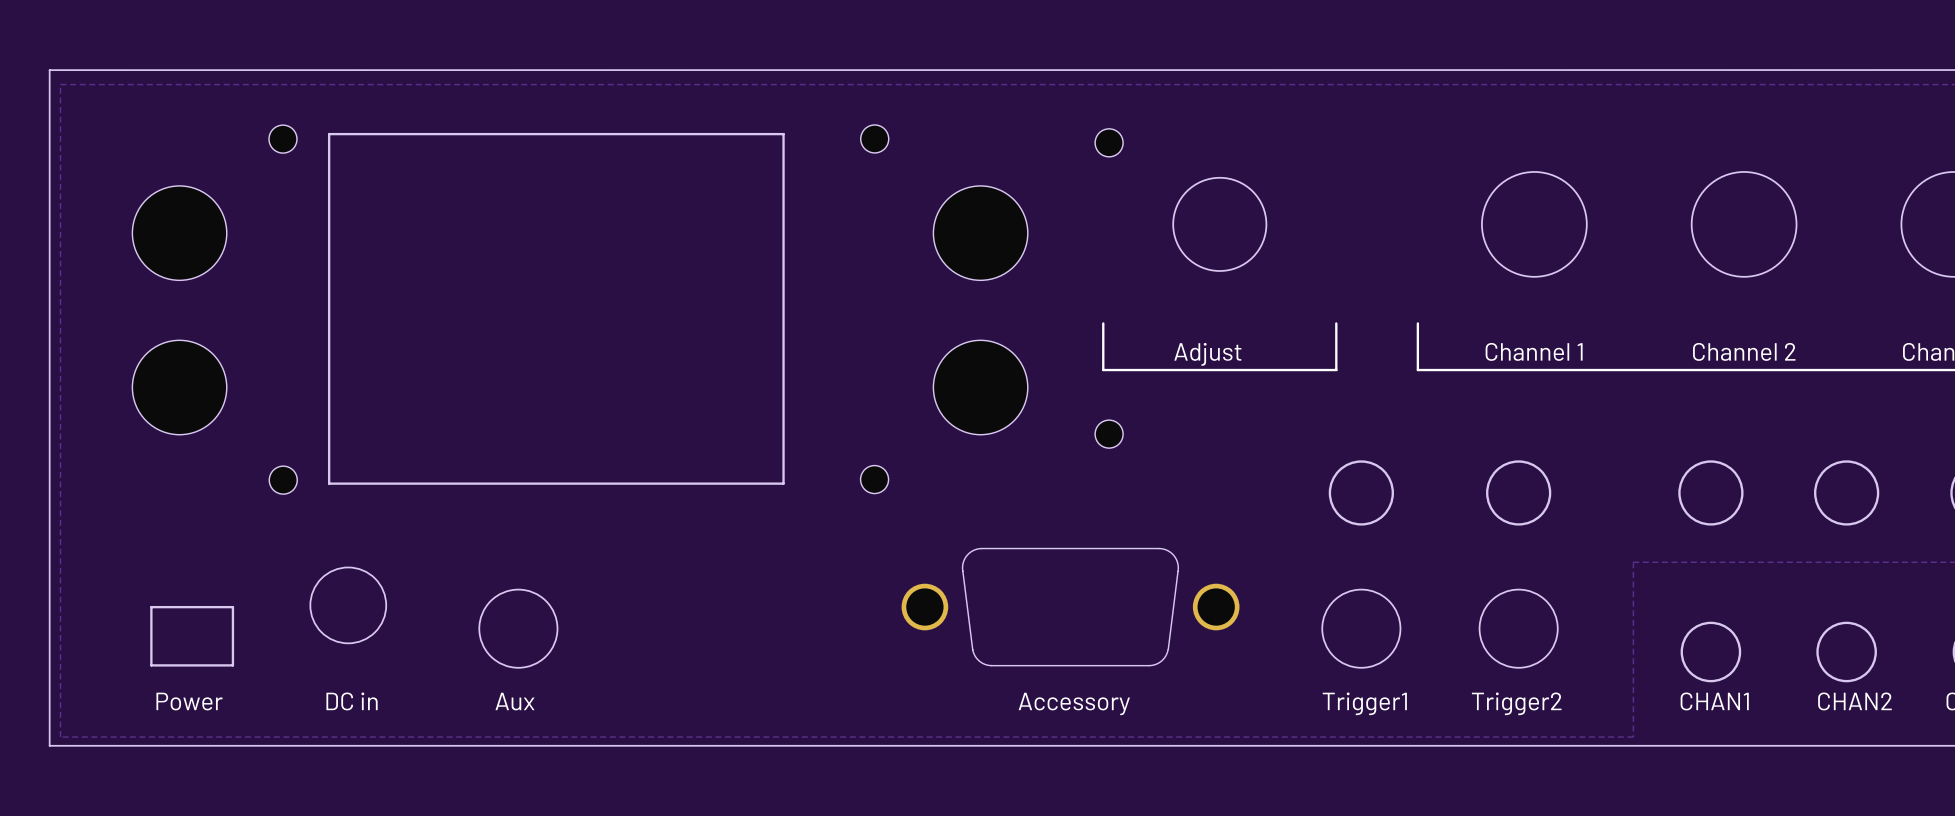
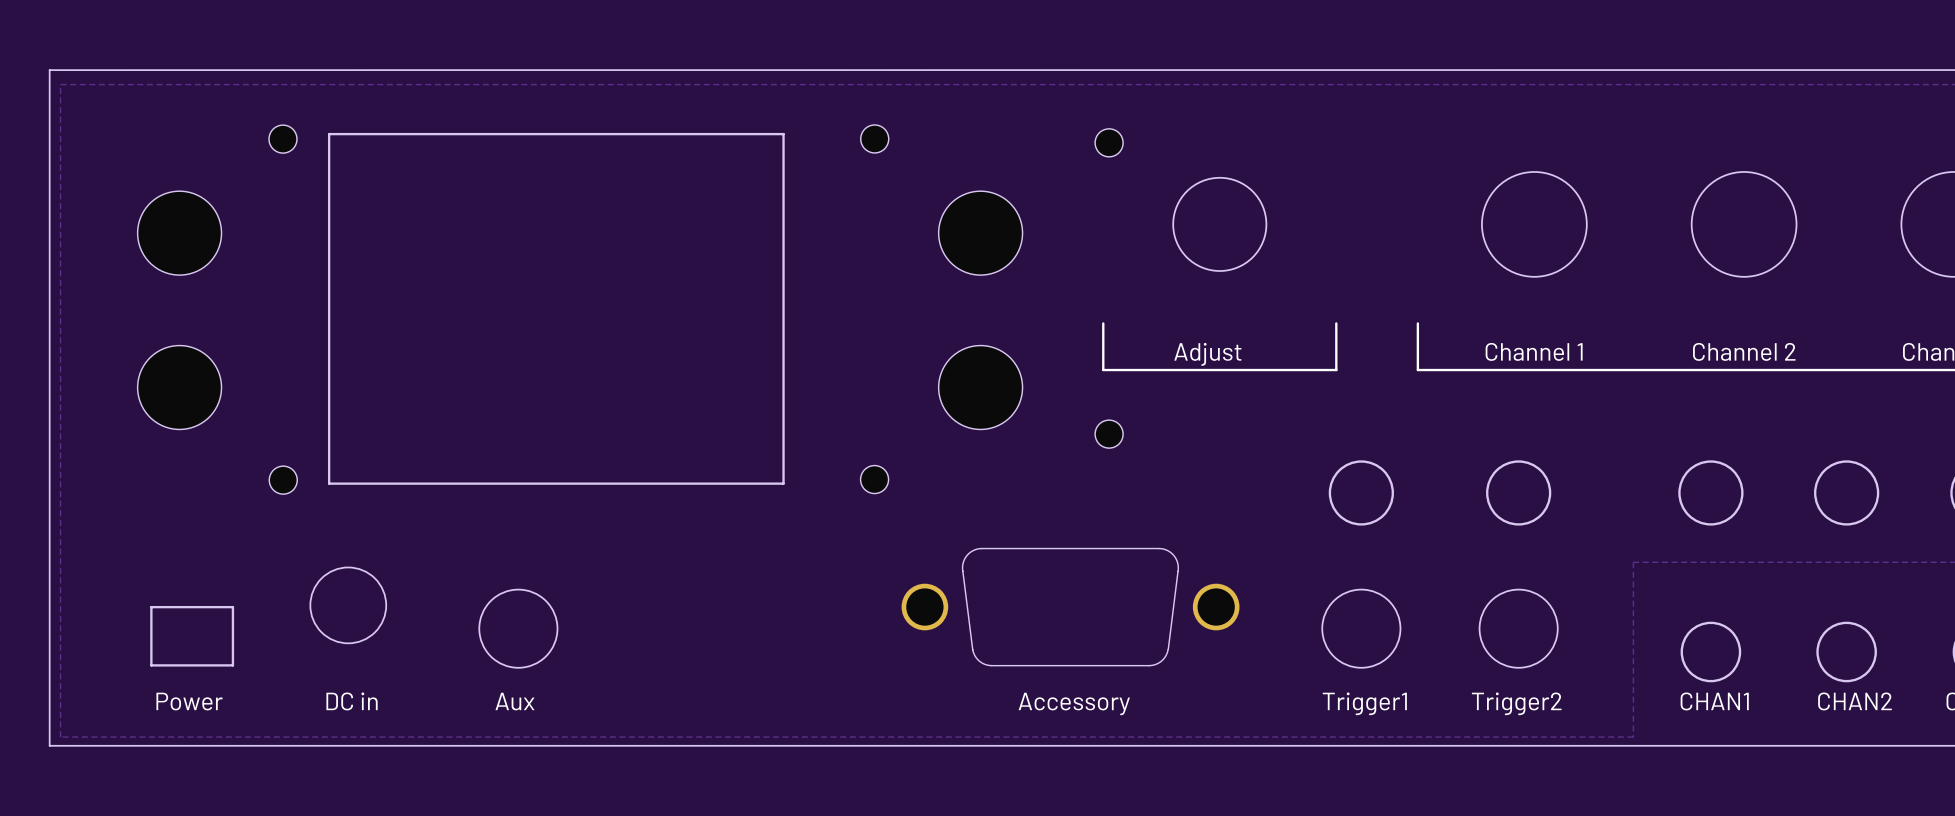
part footprint: [132, 185, 227, 281] -> [137, 191, 222, 276]
part footprint: [933, 185, 1028, 281] -> [938, 191, 1023, 276]
part footprint: [132, 340, 227, 435] -> [137, 345, 222, 430]
part footprint: [933, 340, 1028, 435] -> [938, 345, 1023, 430]

